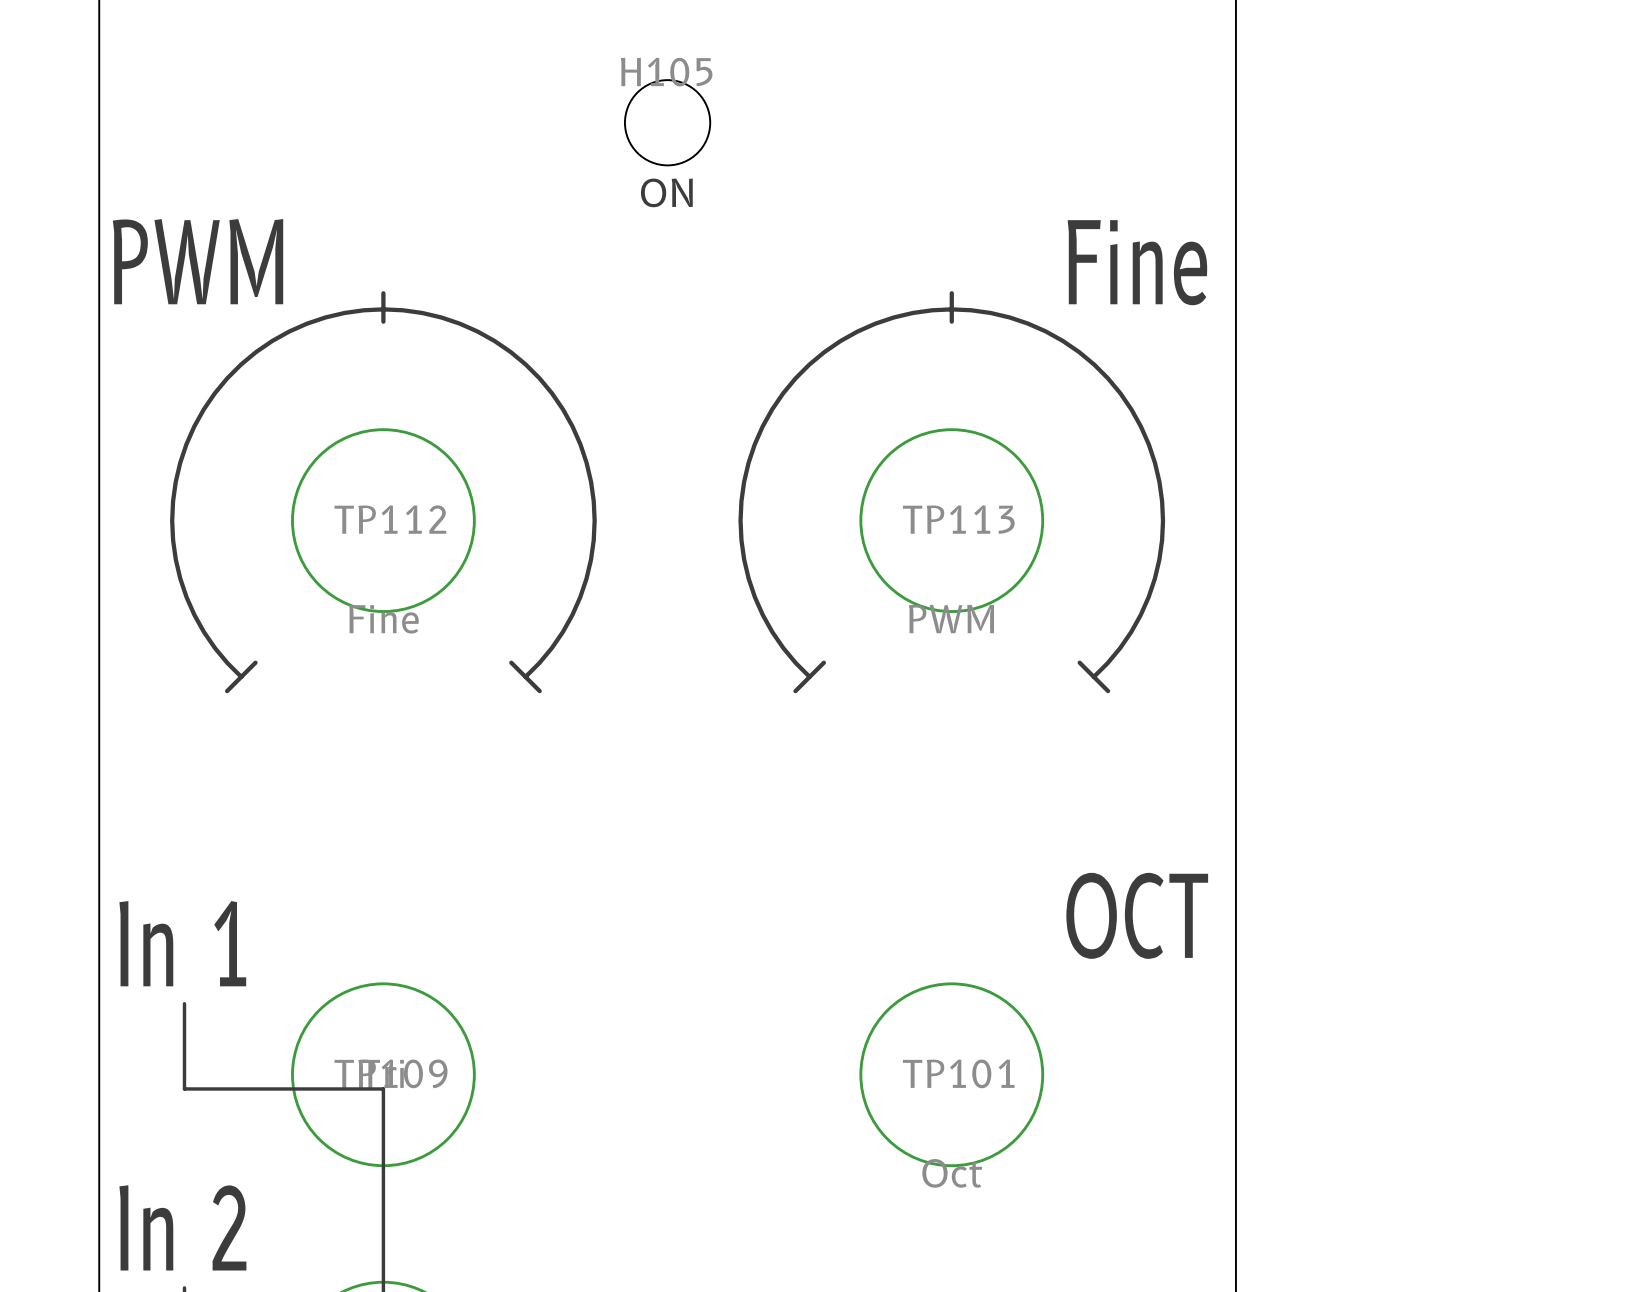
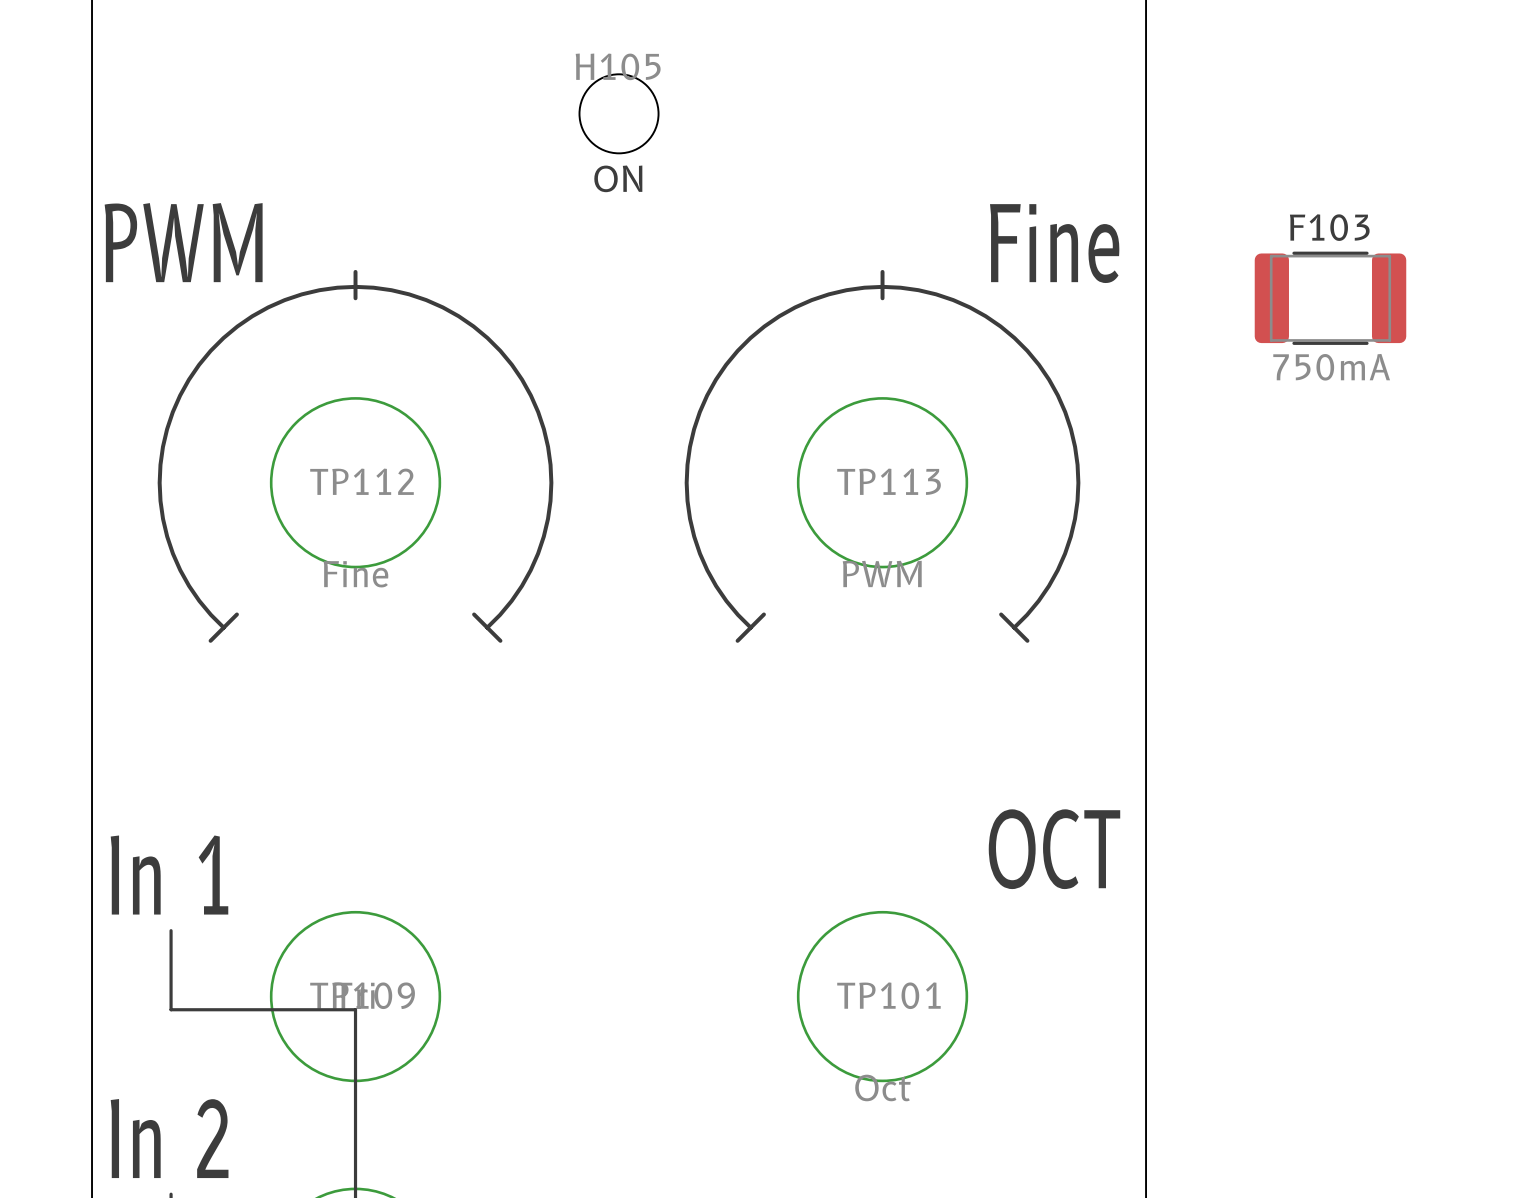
F103: none -> 750mA (1330, 298)

